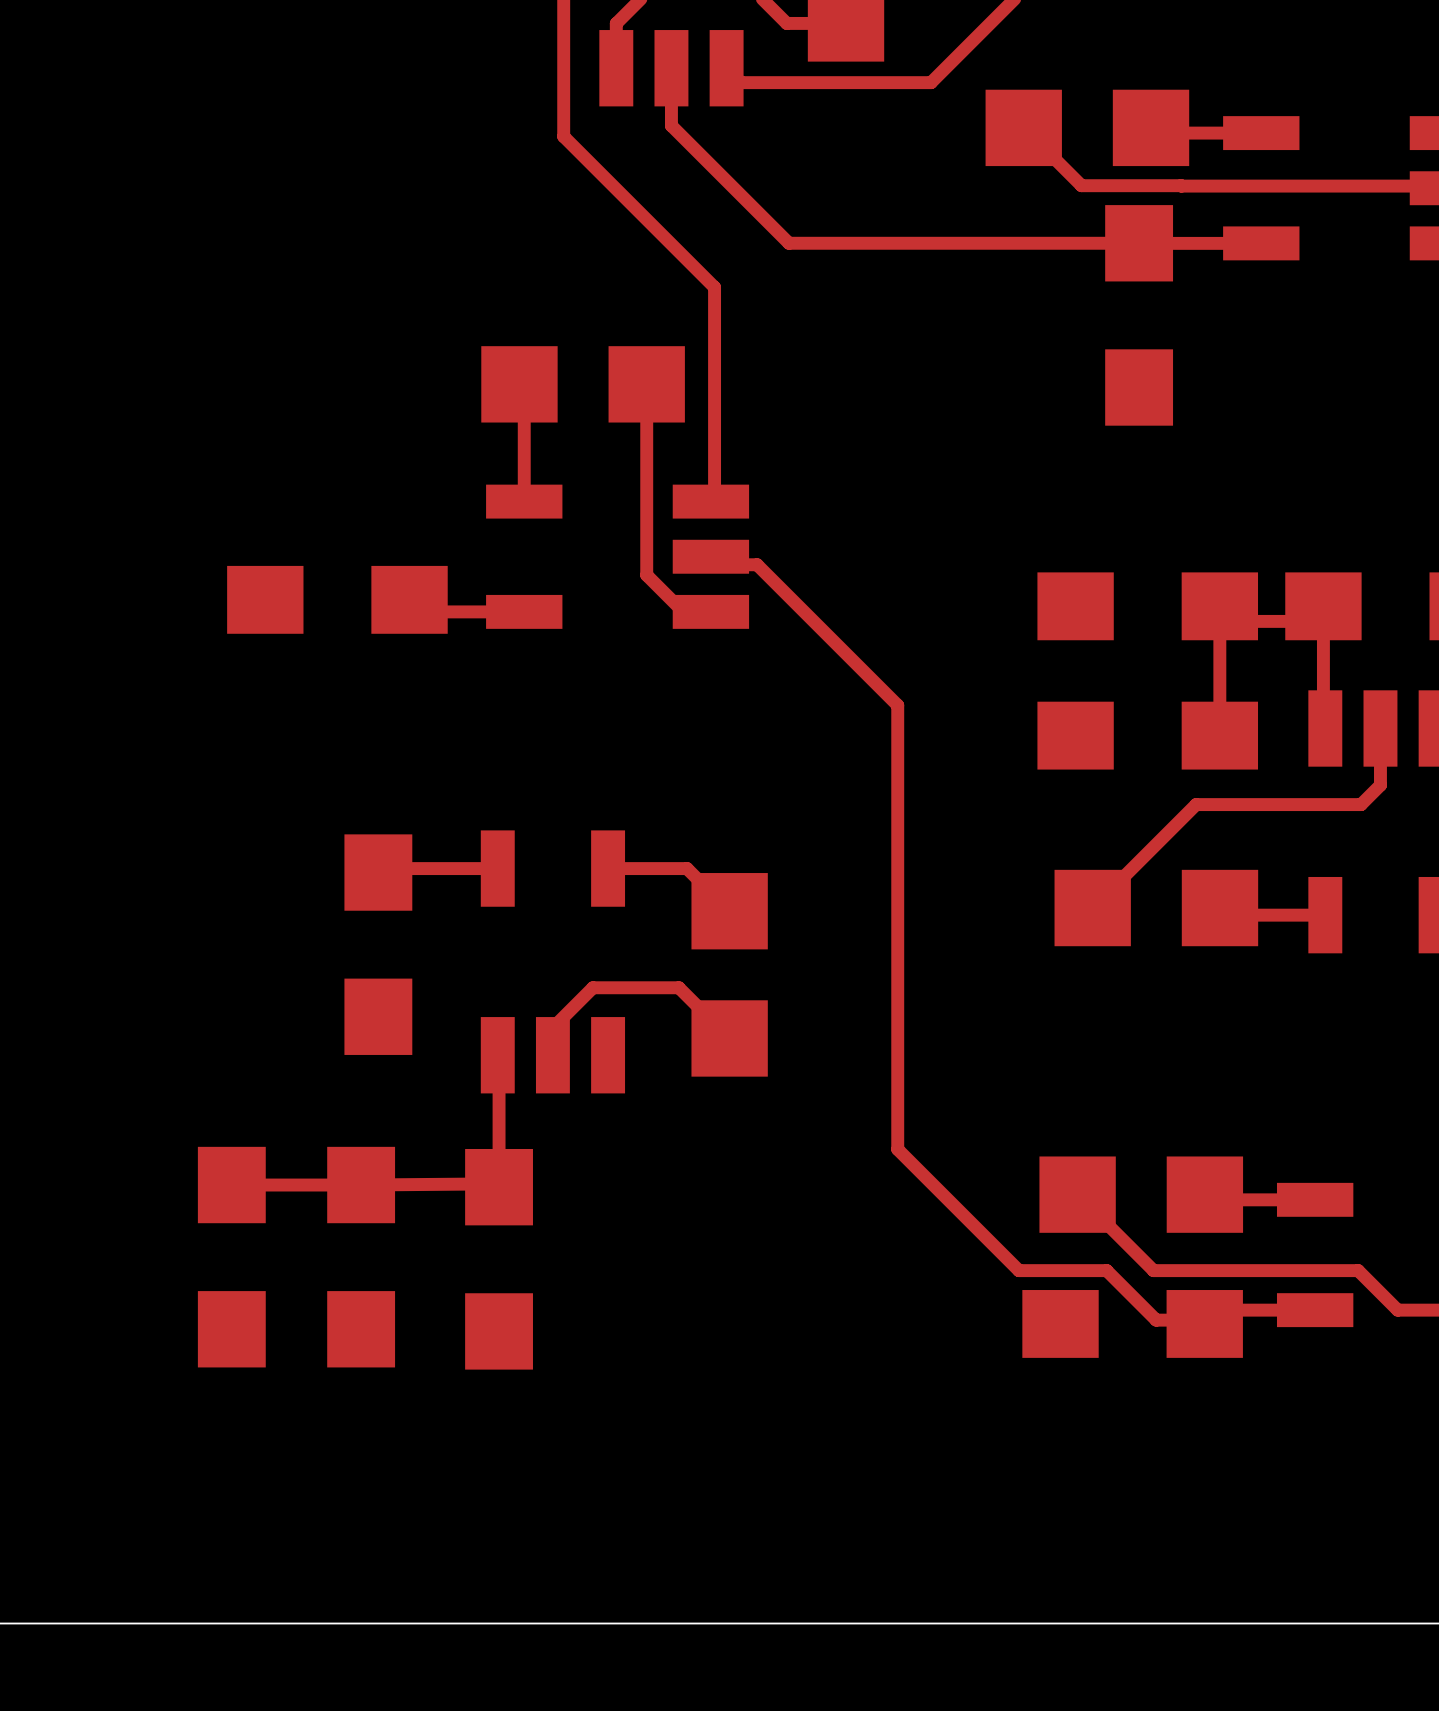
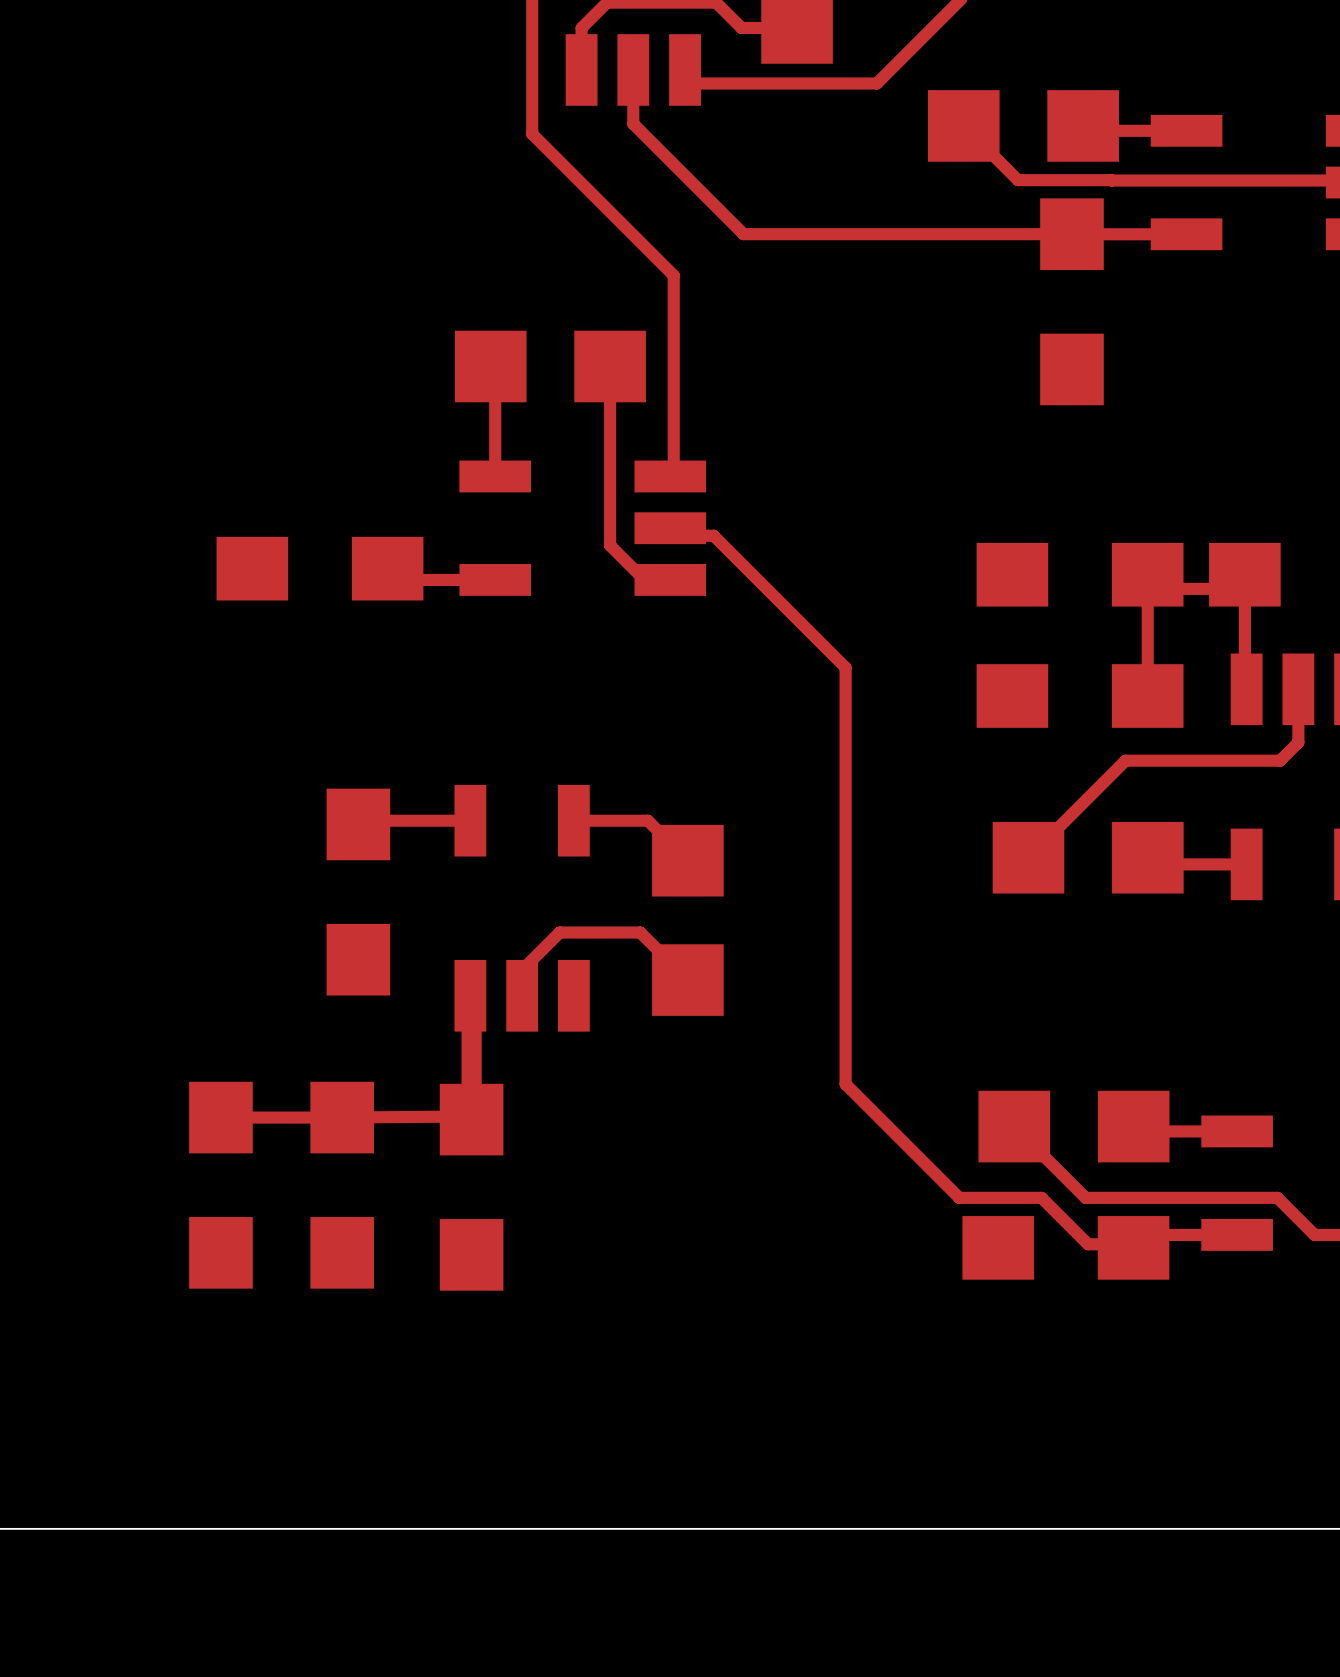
top track width: thin (499, 1056) (499, 1180) -> thick (471, 997) (471, 1113)

